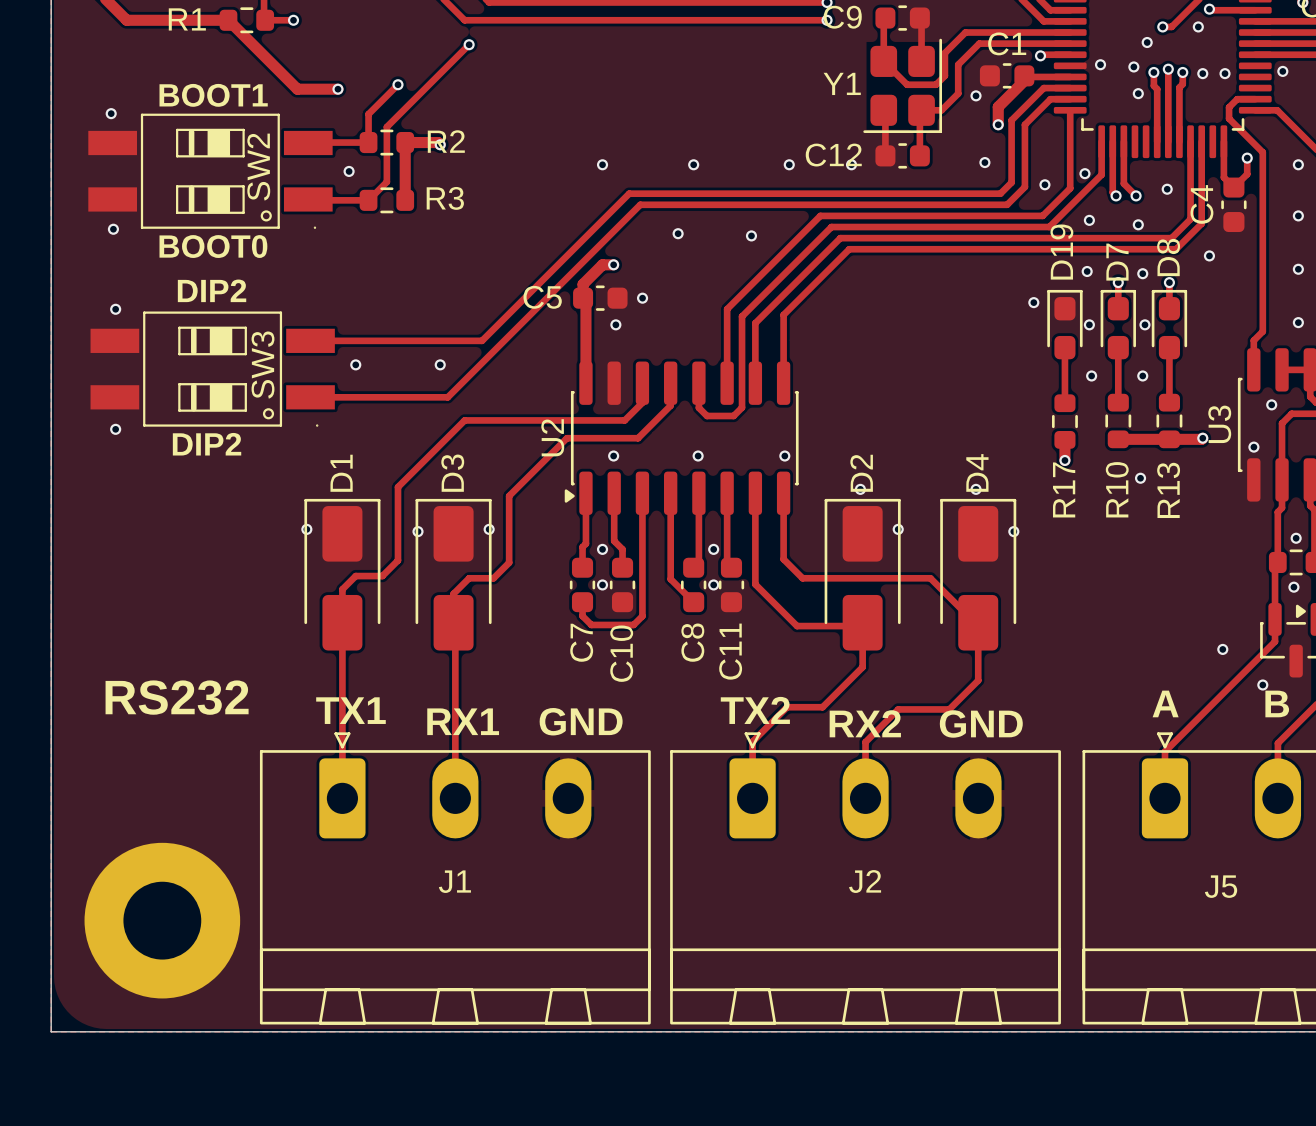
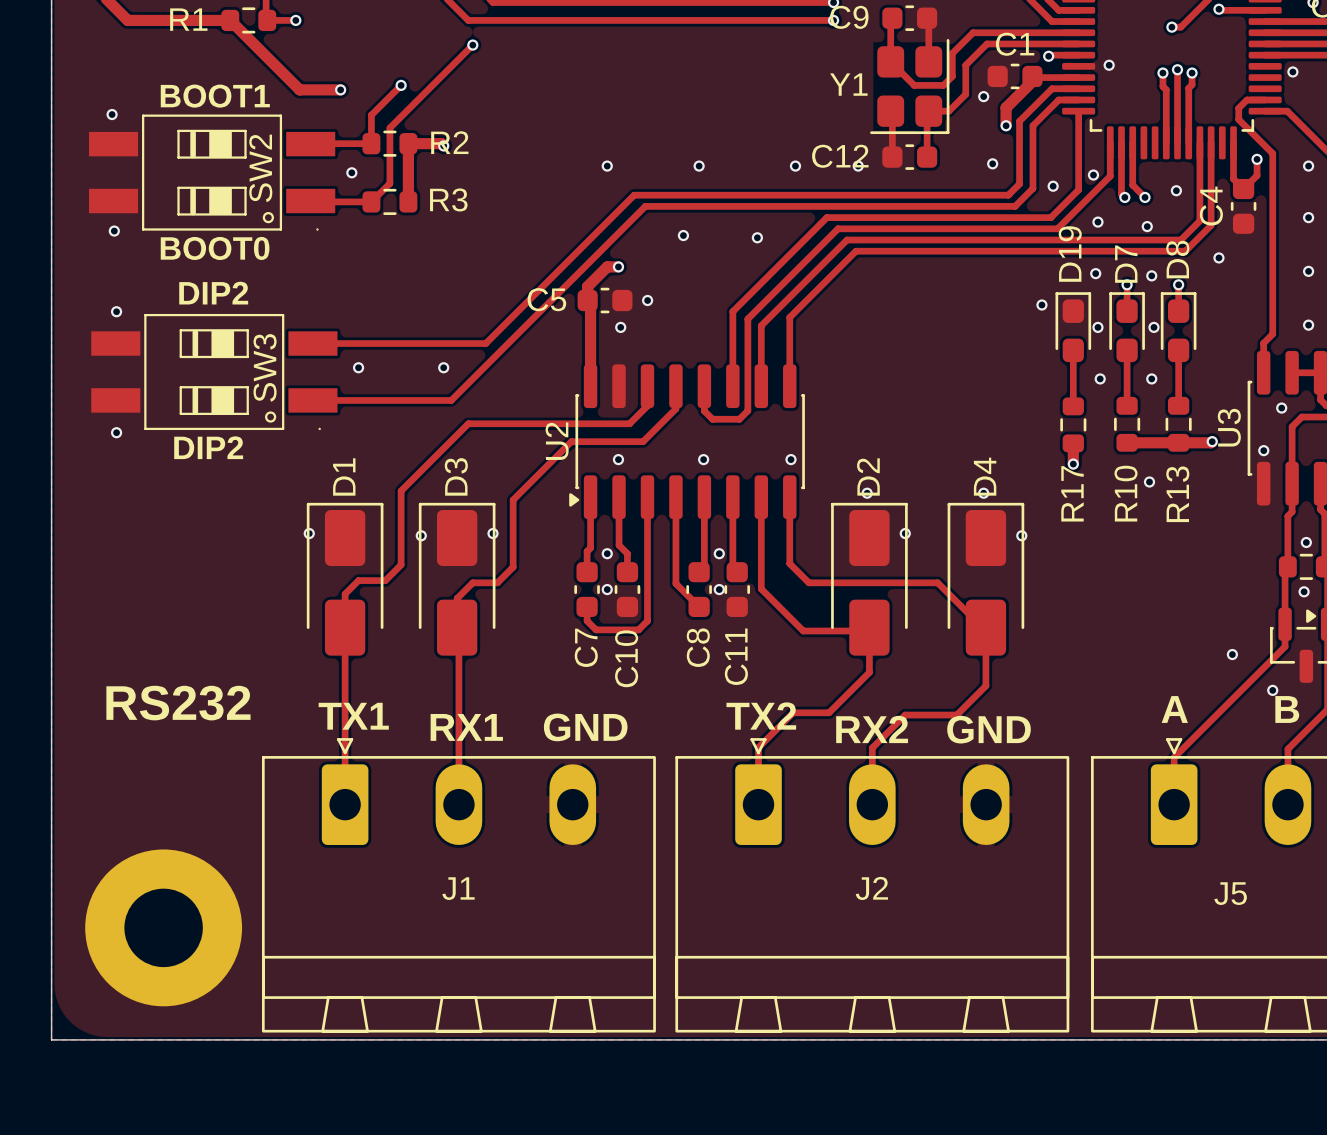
via: (1198, 26) -> none
via: (1147, 42) -> none
via: (1133, 66) -> none
via: (1202, 73) -> none
via: (1225, 73) -> none
via: (1138, 93) -> none

